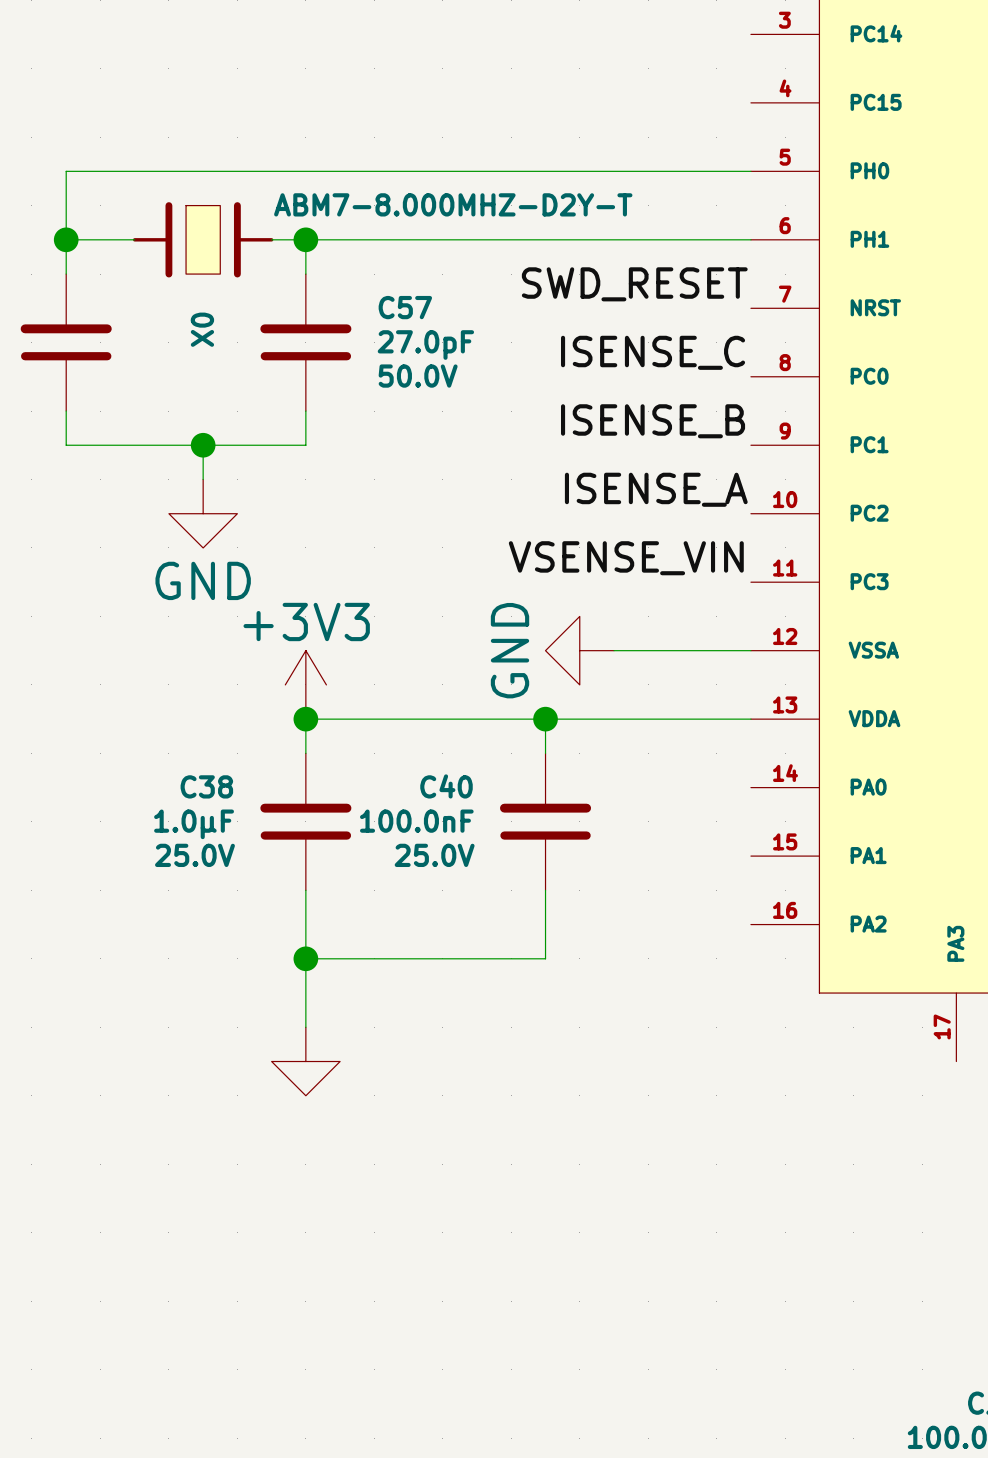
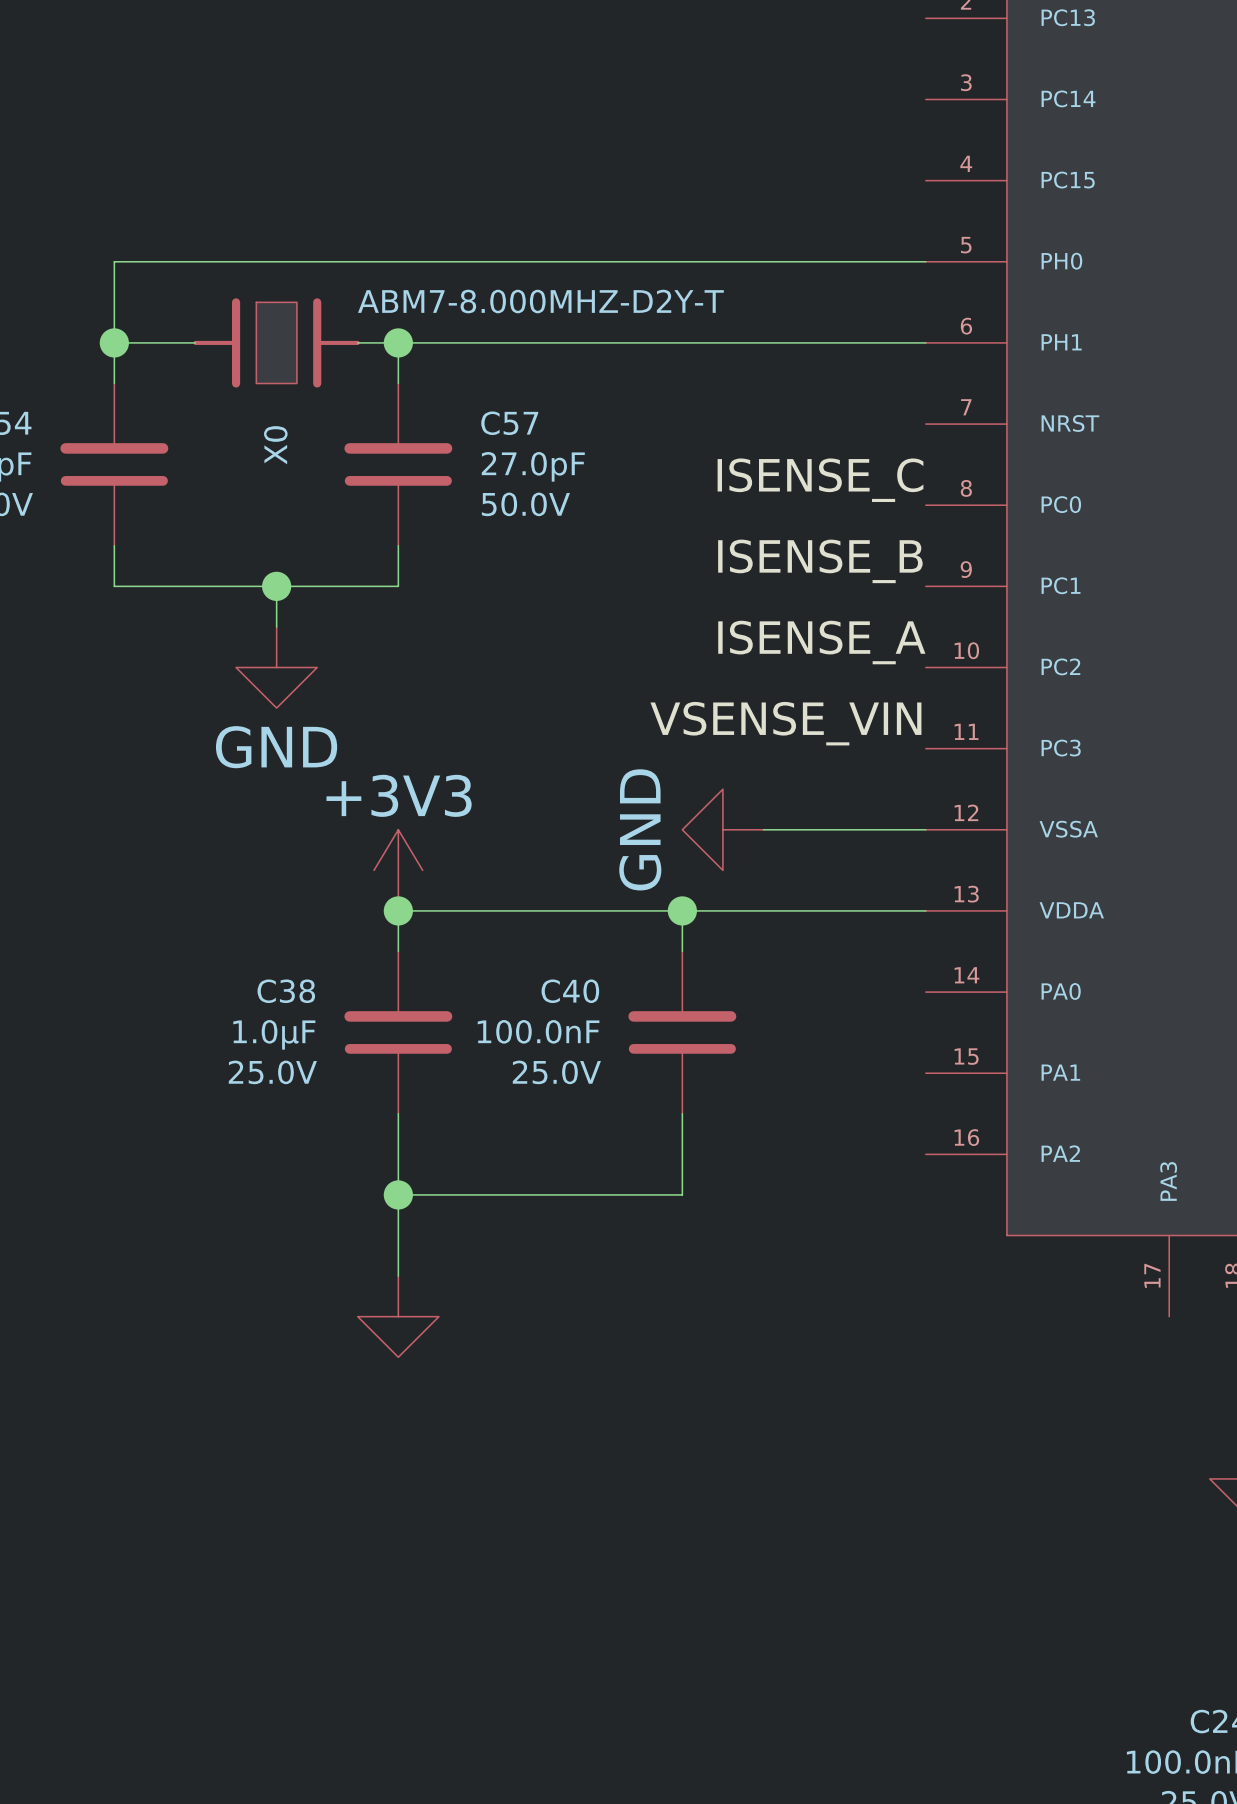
label: SWD_RESET (634, 284) -> none

